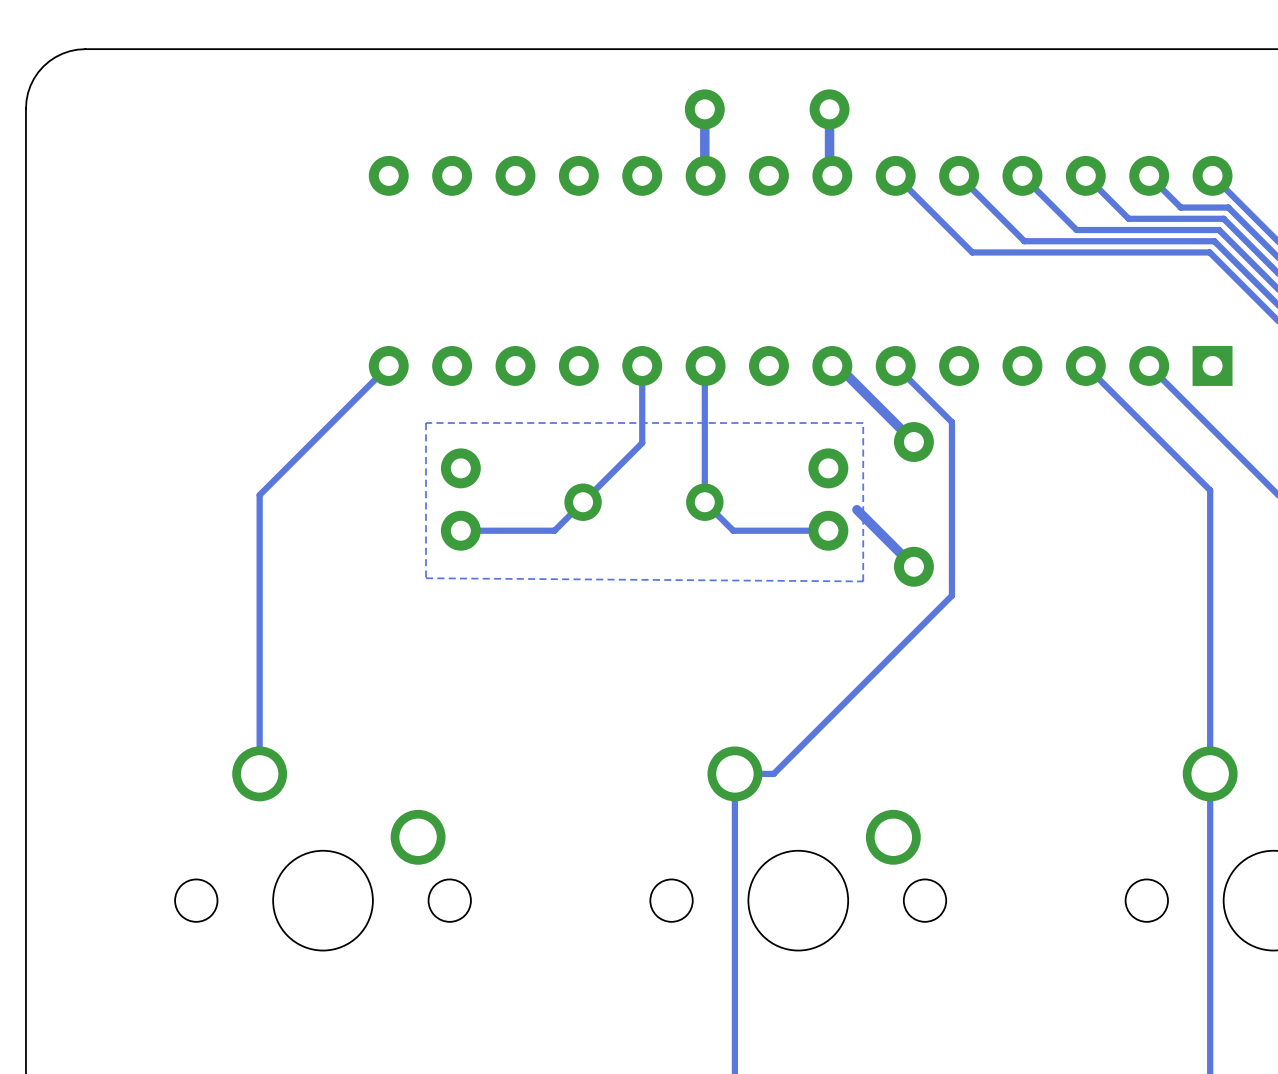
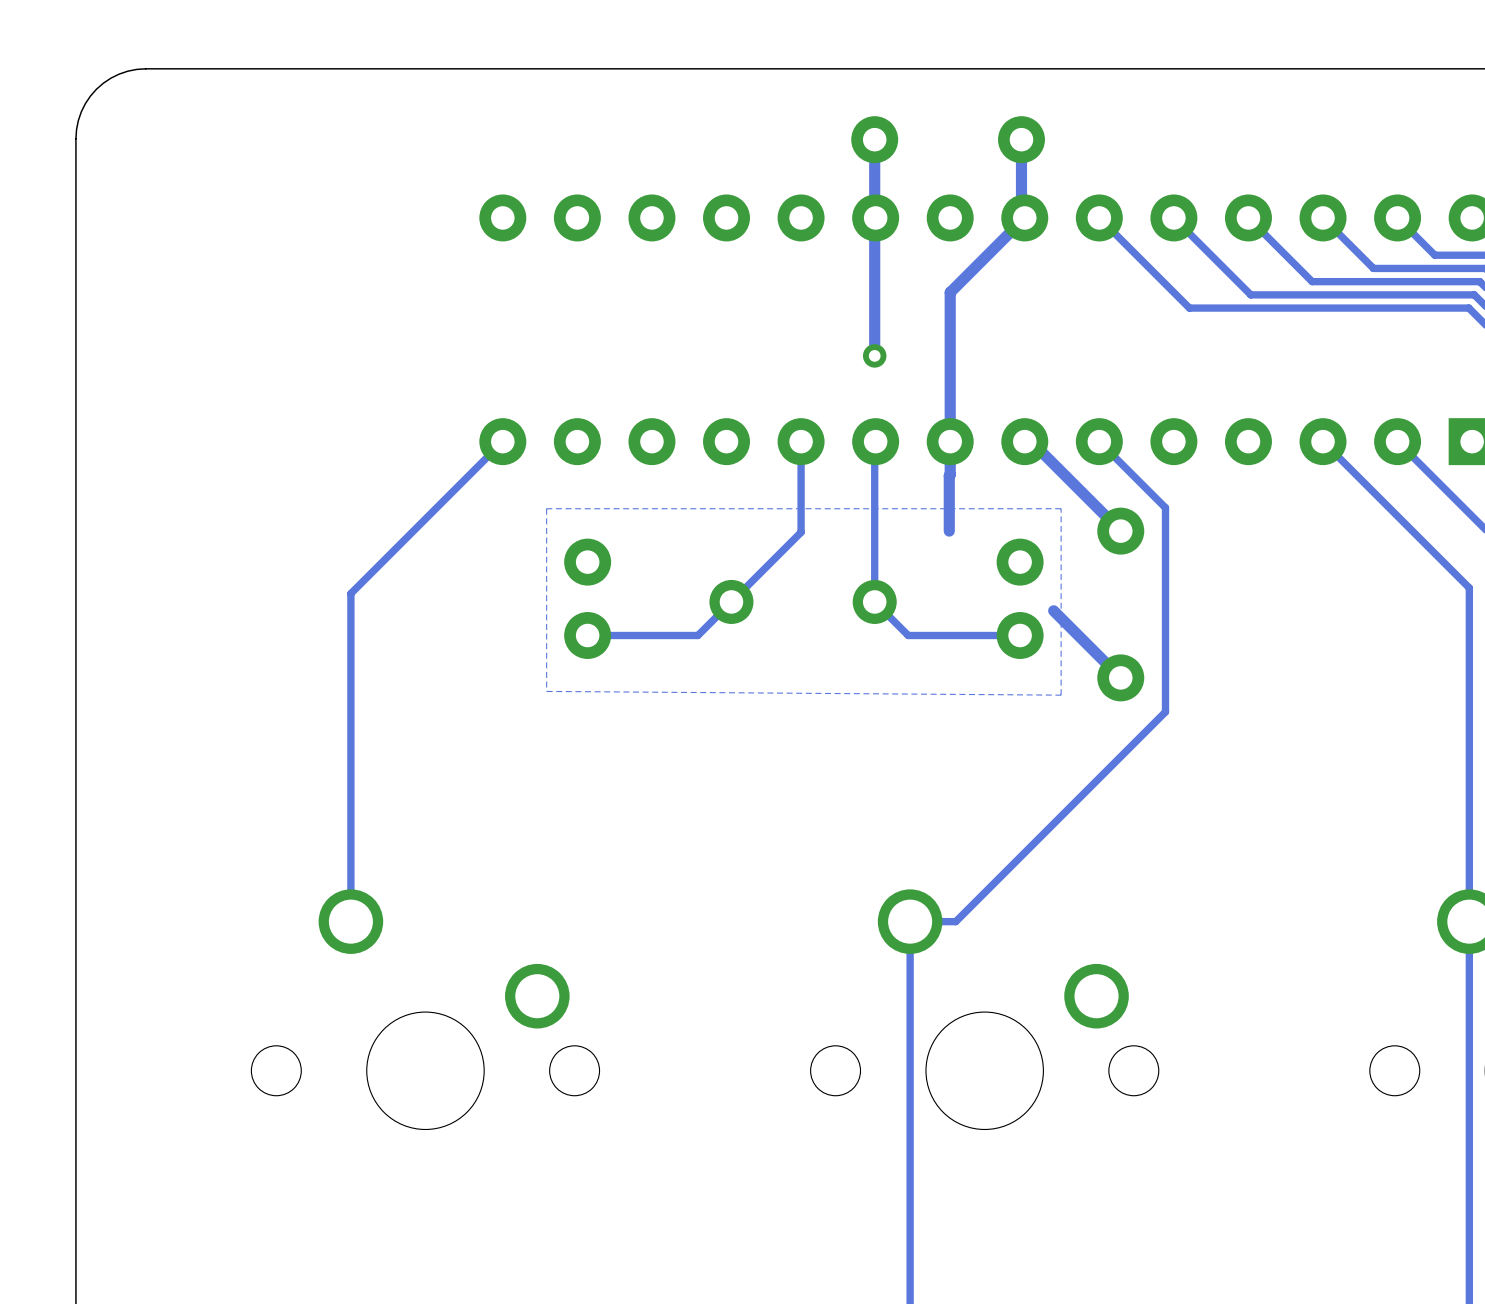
track: none -> (875, 217) (874, 355)
track: none -> (1024, 217) (950, 292) (950, 441)
via: none -> (874, 355)
track: none -> (950, 458) (949, 531)

